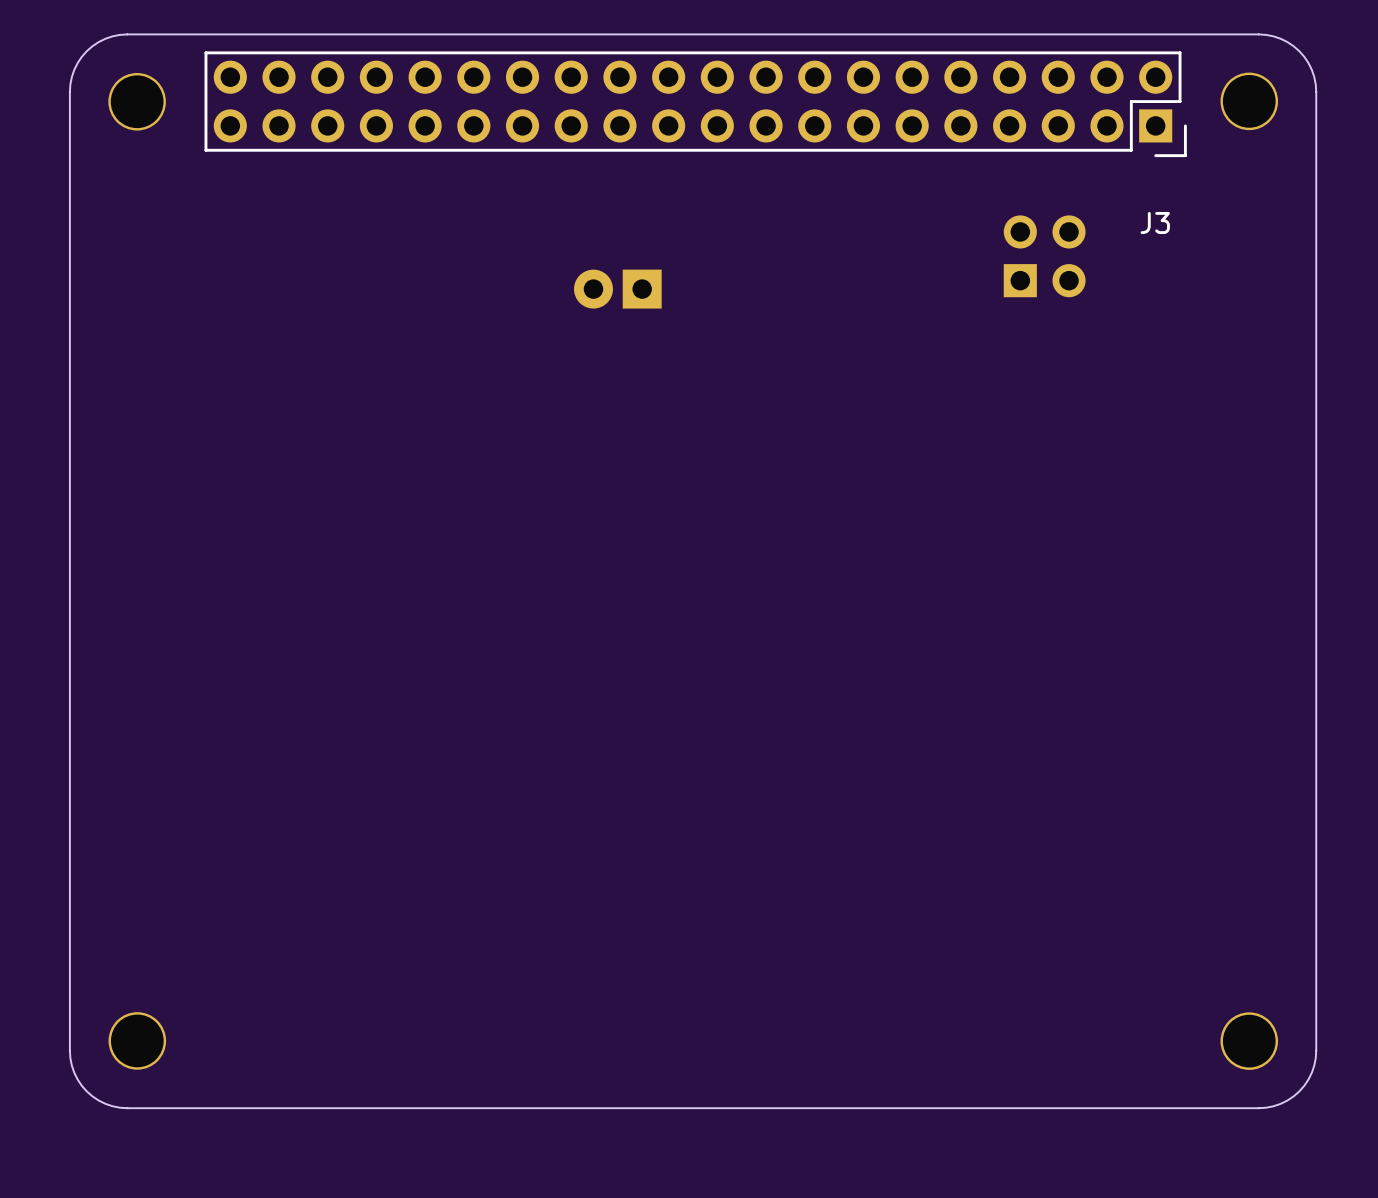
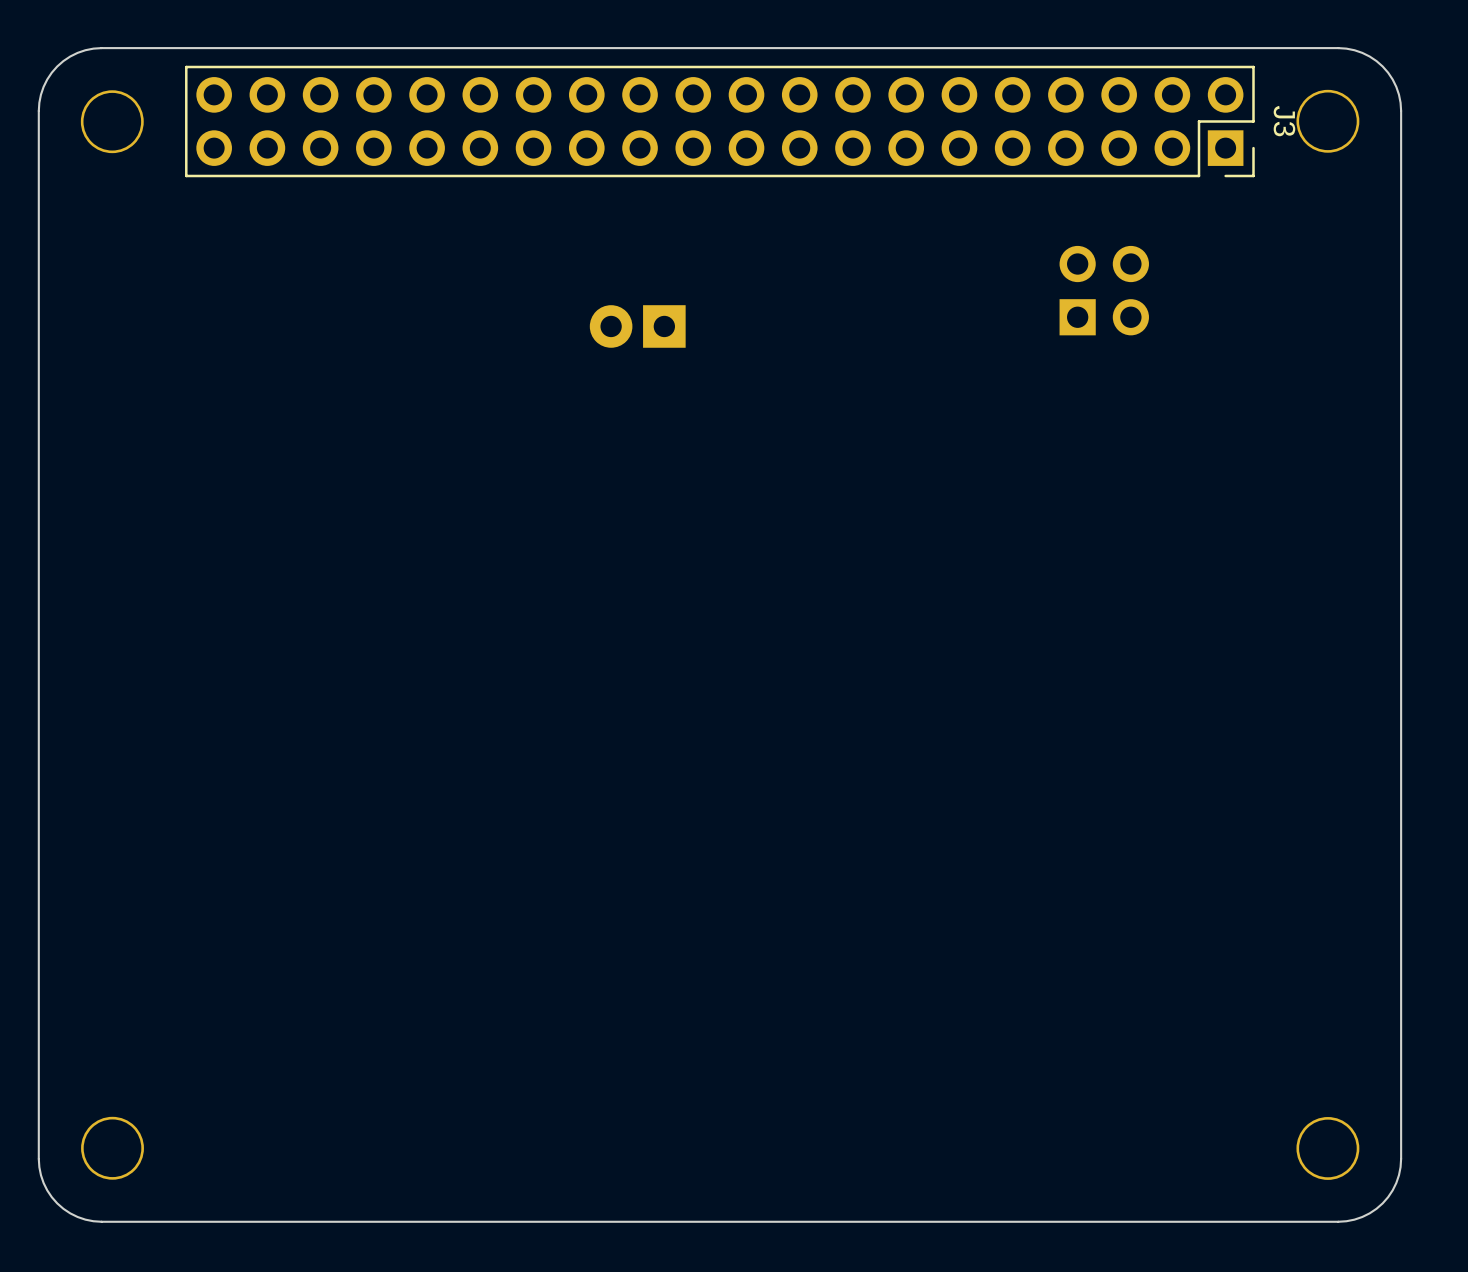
J3 footprint: [204, 51, 1187, 158] -> [185, 65, 1255, 178]
J3 name rotation: 0° (1155, 222) -> 90° clockwise (1284, 121)
J3 name position: J3 (1155, 222) -> J3 (1284, 121)

